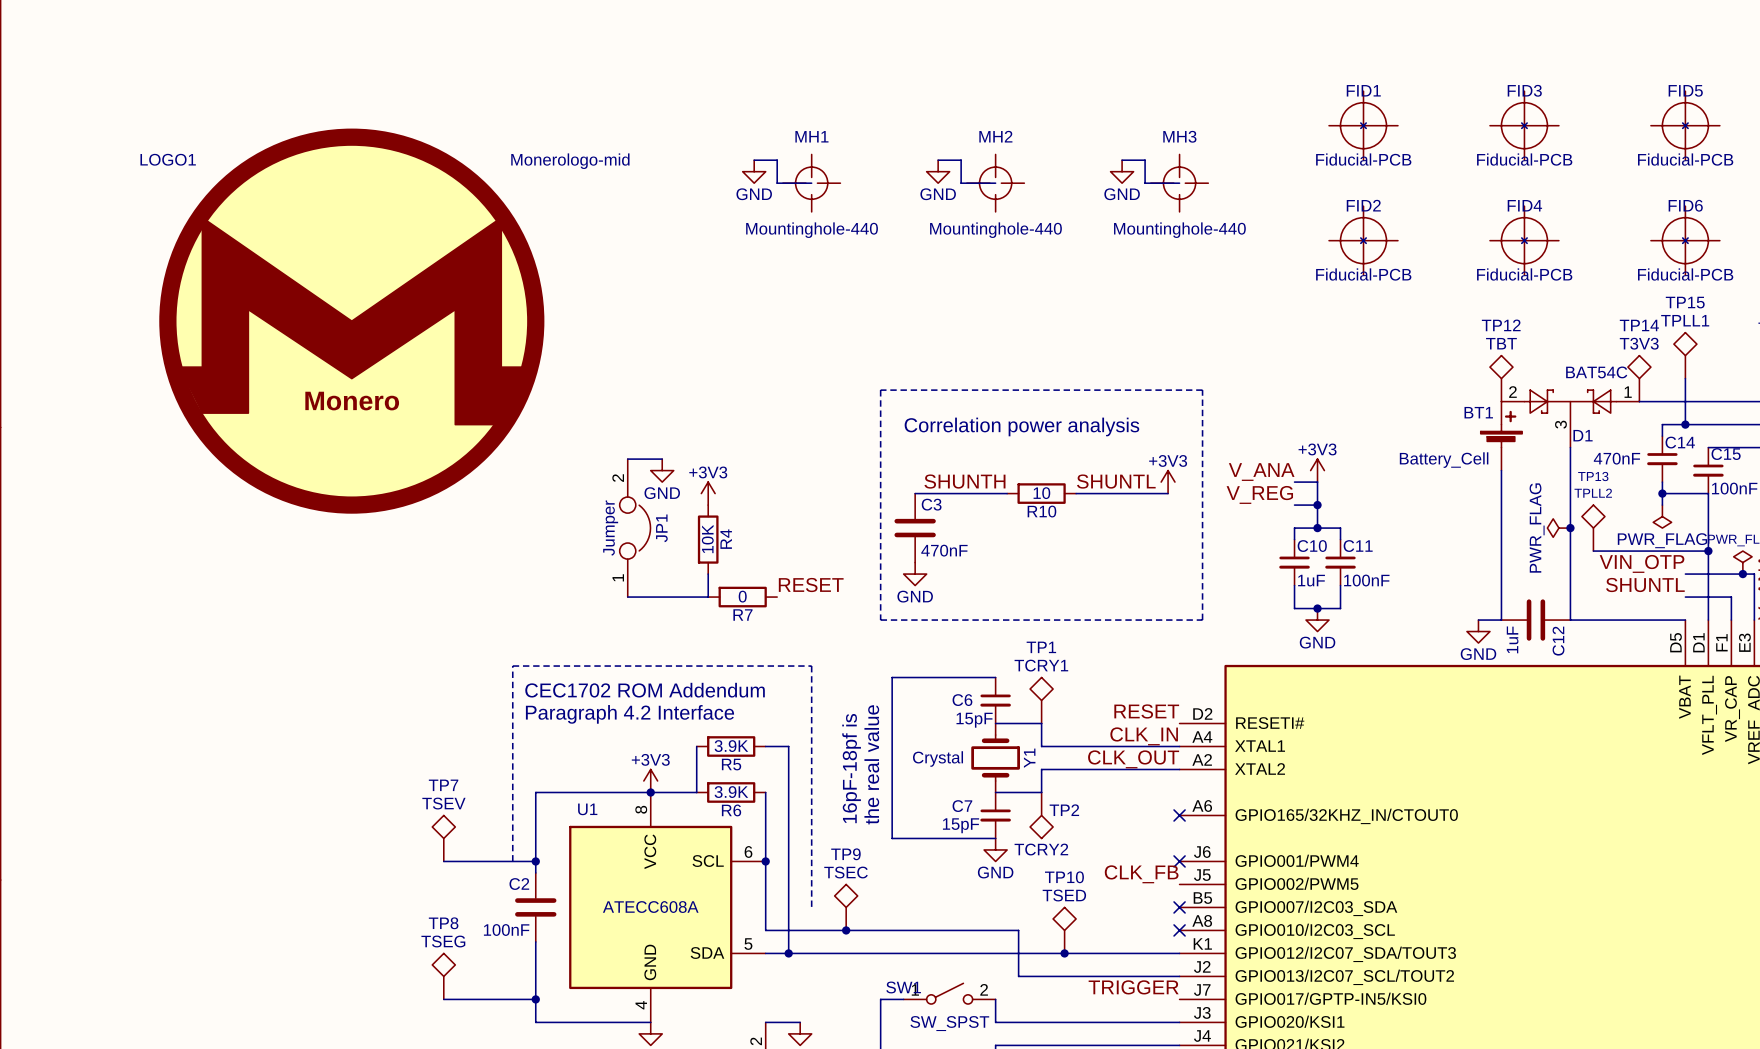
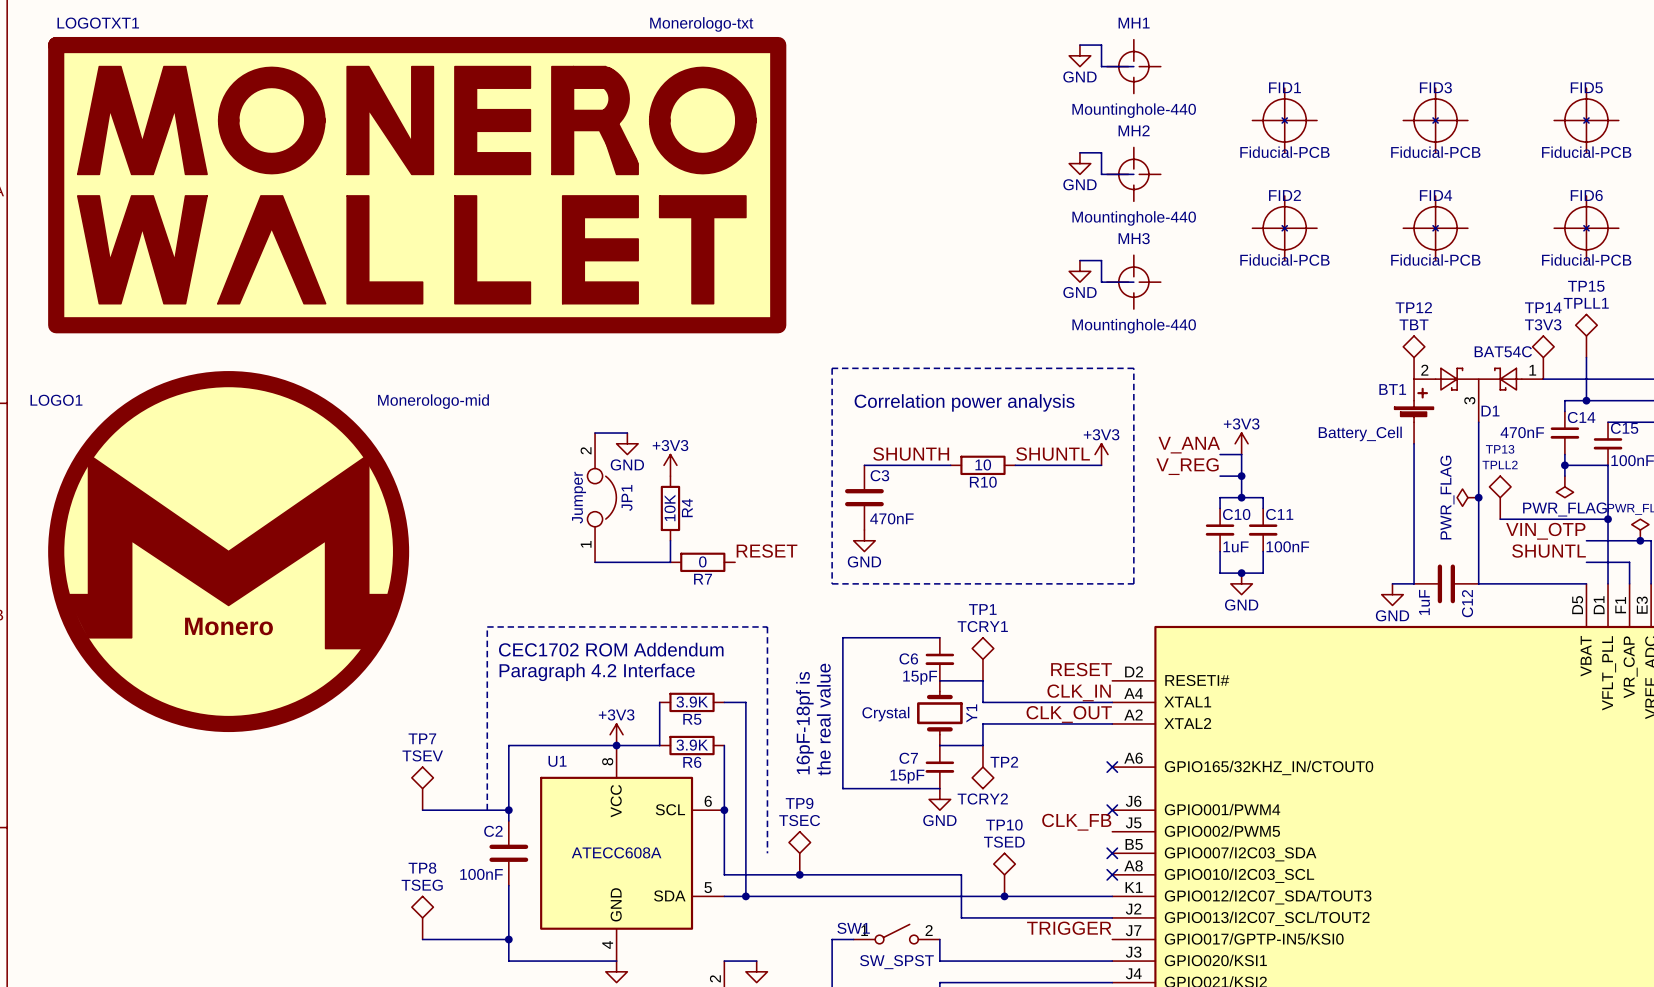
wire: none -> (1079, 45) (1101, 45) (1101, 66) (1133, 66)
power symbol: none -> GND (1079, 55)
wire: (938, 160) (961, 160) (961, 183) (995, 183) -> none
wire: (1122, 160) (1145, 160) (1145, 183) (1168, 183) -> (1079, 152) (1101, 152) (1101, 174)
power symbol: GND (754, 171) -> none
power symbol: GND (938, 171) -> none
power symbol position: GND (1122, 171) -> GND (1079, 163)
MH1 position: (811, 183) -> (1133, 66)
MH2 position: (995, 183) -> (1133, 174)
MH3 position: (1179, 183) -> (1133, 282)
LOGOTXT1: none -> Monerologo-txt (417, 185)
wire: none -> (1079, 260) (1101, 260) (1101, 282) (1133, 282)
power symbol: none -> GND (1079, 271)
LOGO1 position: (351, 321) -> (228, 551)

